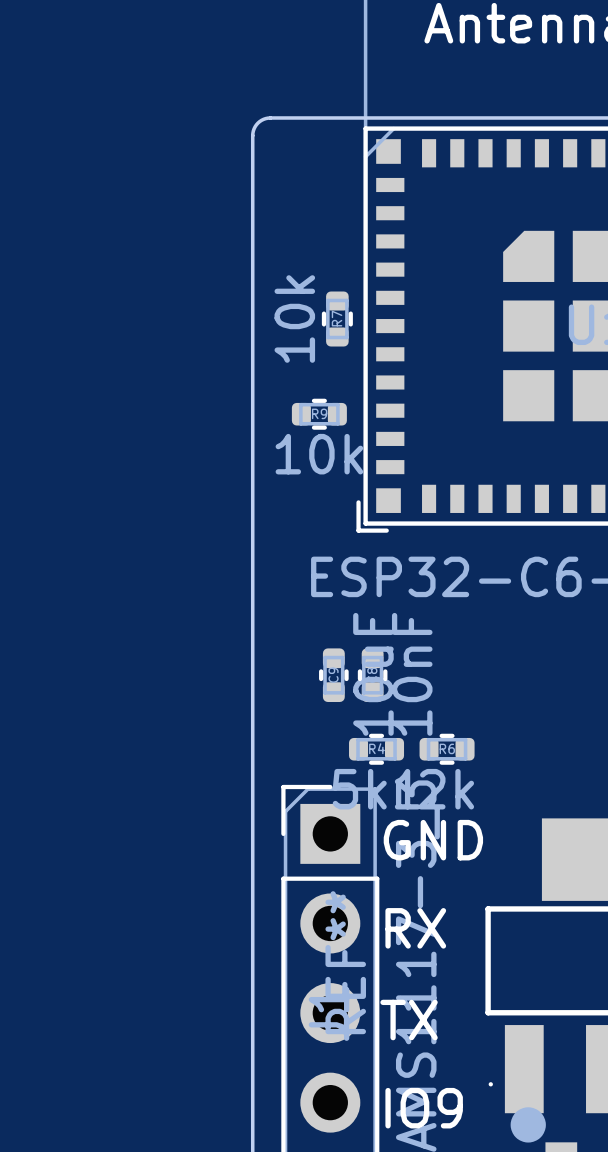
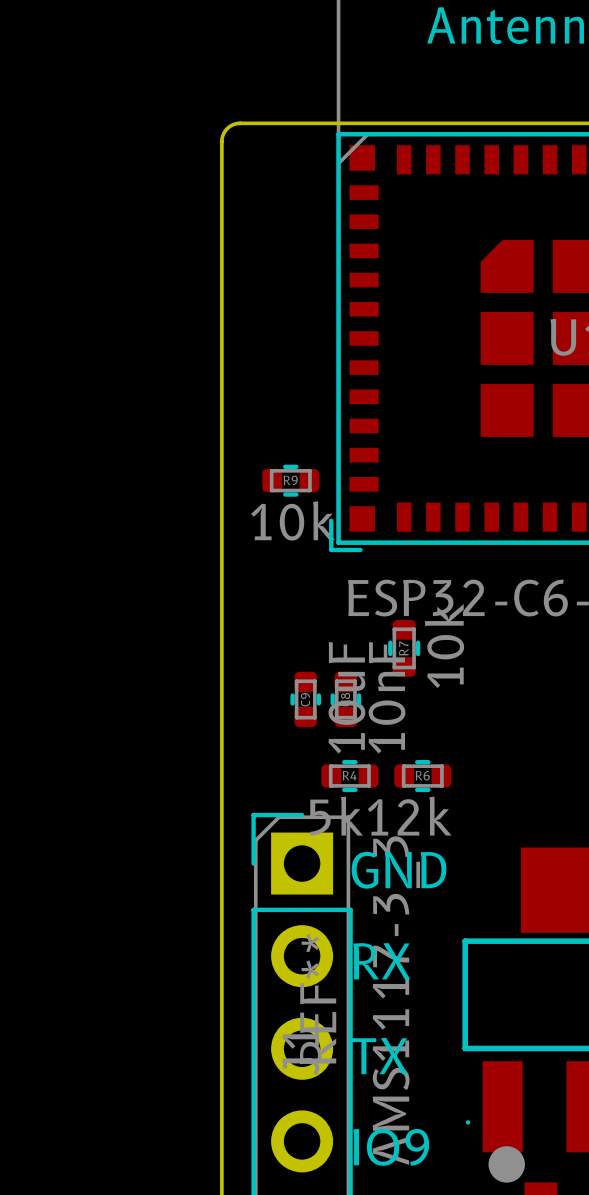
R7 value position: 10k (294, 319) -> 10k (444, 646)
R7 position: (337, 319) -> (404, 648)
R9 position: (319, 414) -> (290, 480)

